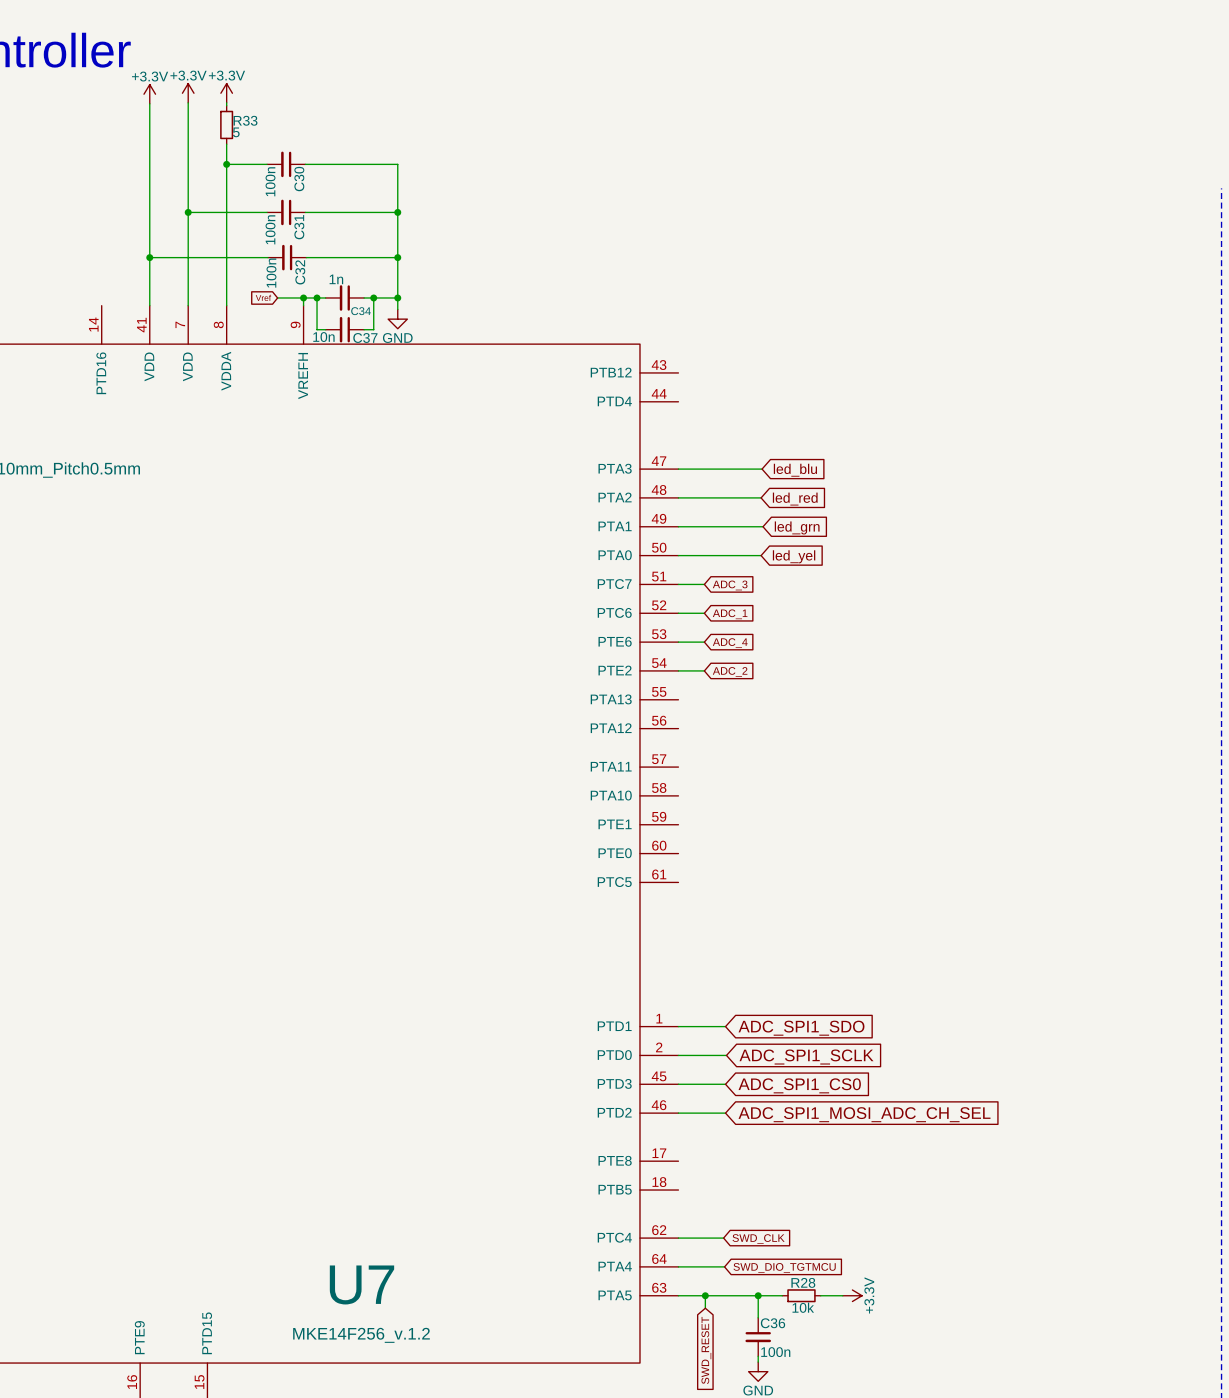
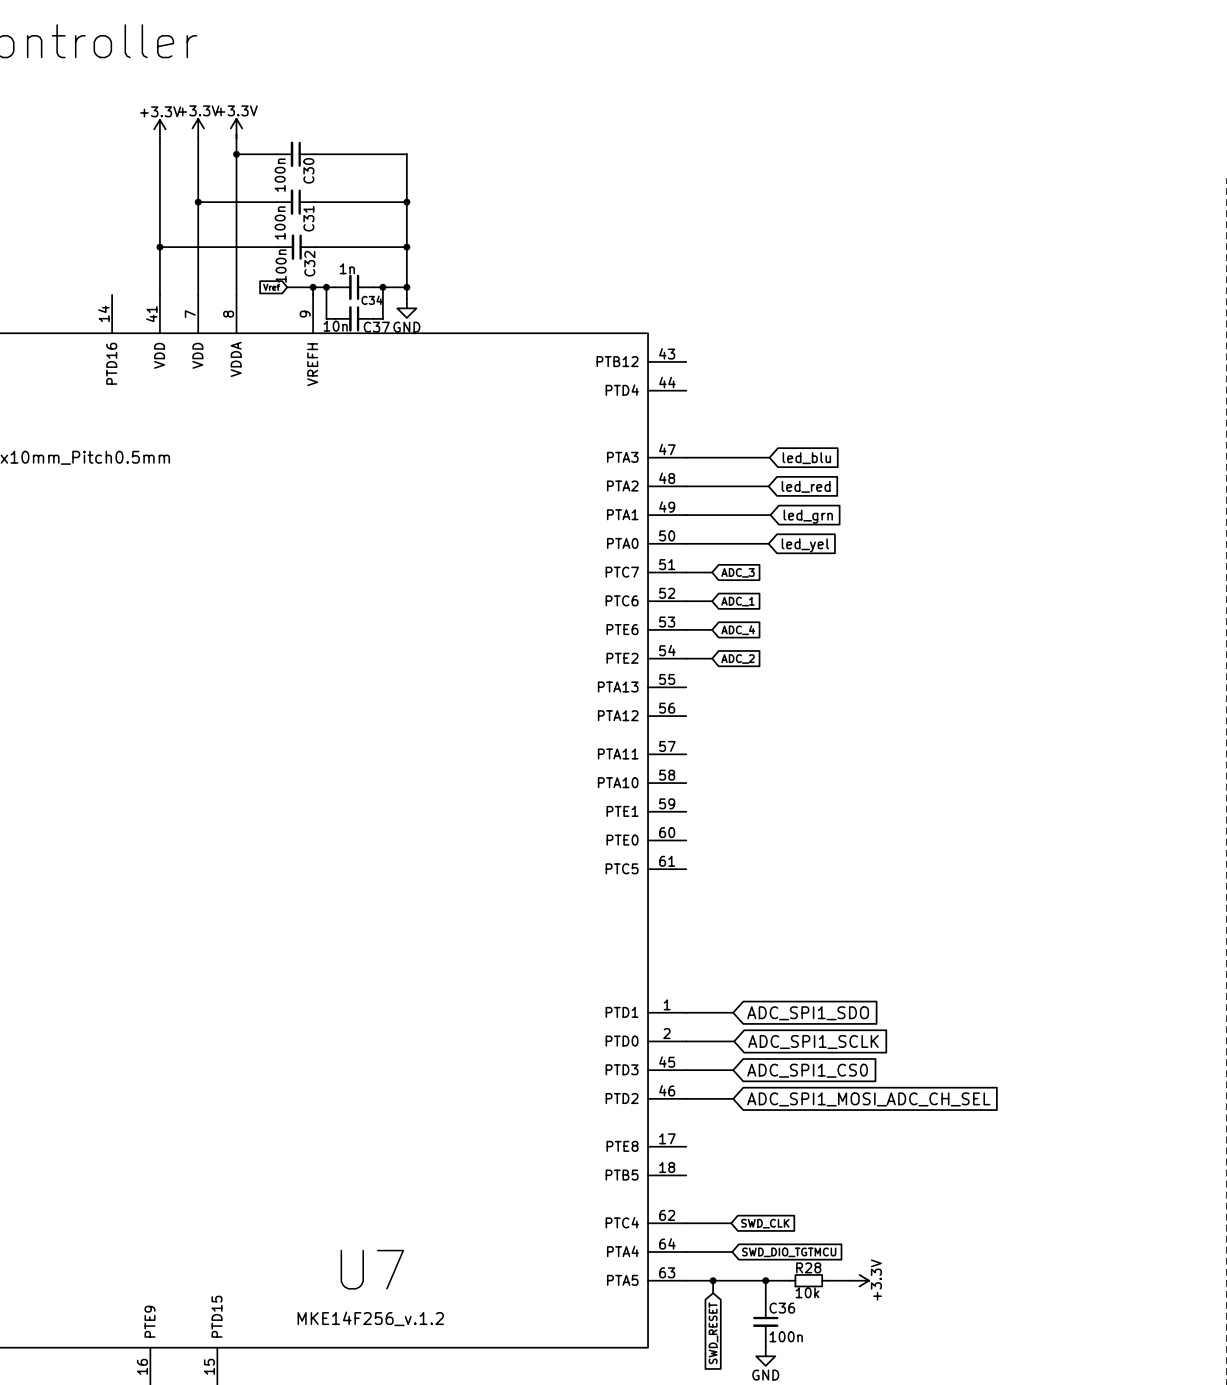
power symbol: +3.3V (188, 93) -> none
power symbol: +3.3V (226, 93) -> none
power symbol: +3.3V (149, 94) -> none
wire: (188, 102) (188, 148) -> none
wire: (226, 102) (226, 105) -> none
wire: (149, 103) (149, 149) -> none
R33: 5 (226, 124) -> none
power symbol: none -> +3.3V (198, 128)
power symbol: none -> +3.3V (236, 128)
power symbol: none -> +3.3V (159, 129)

